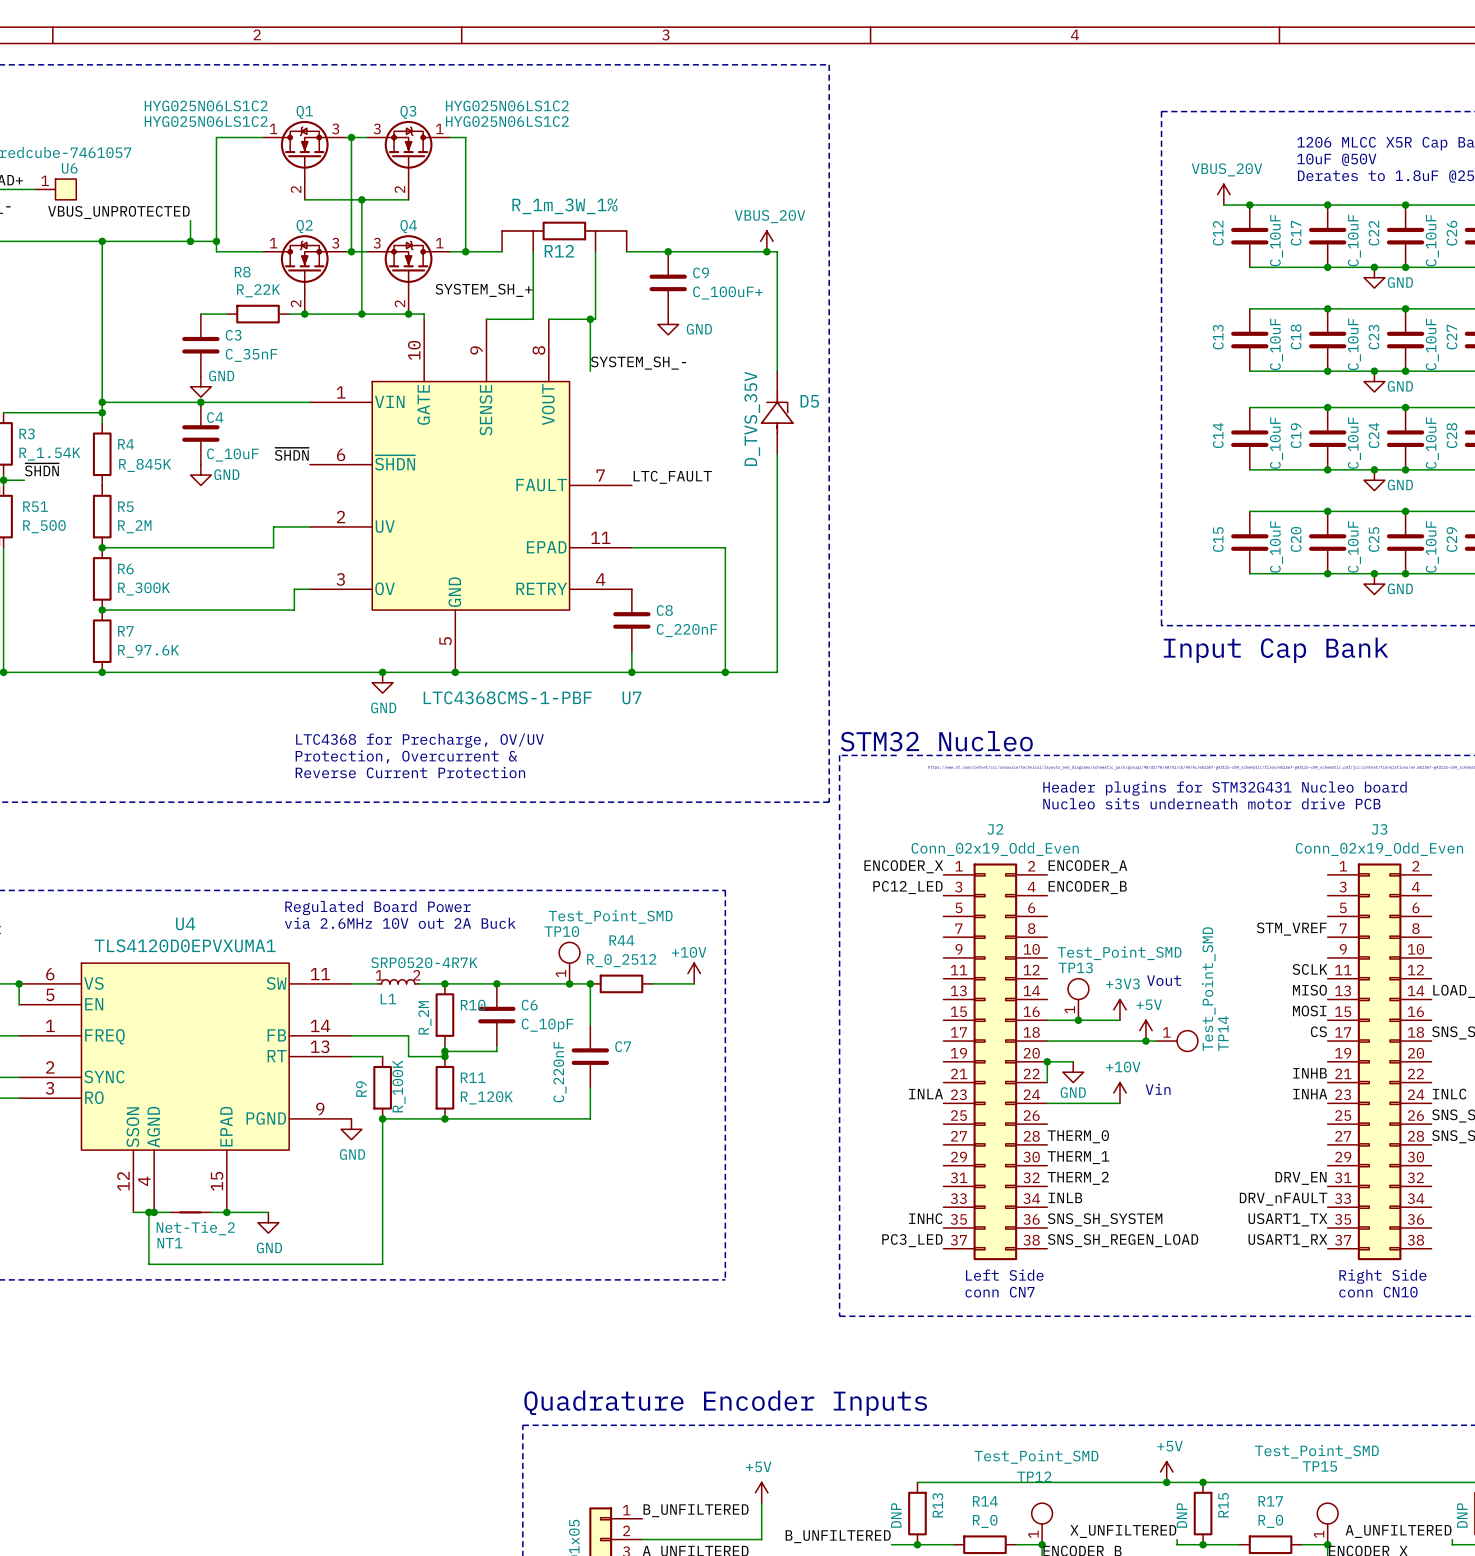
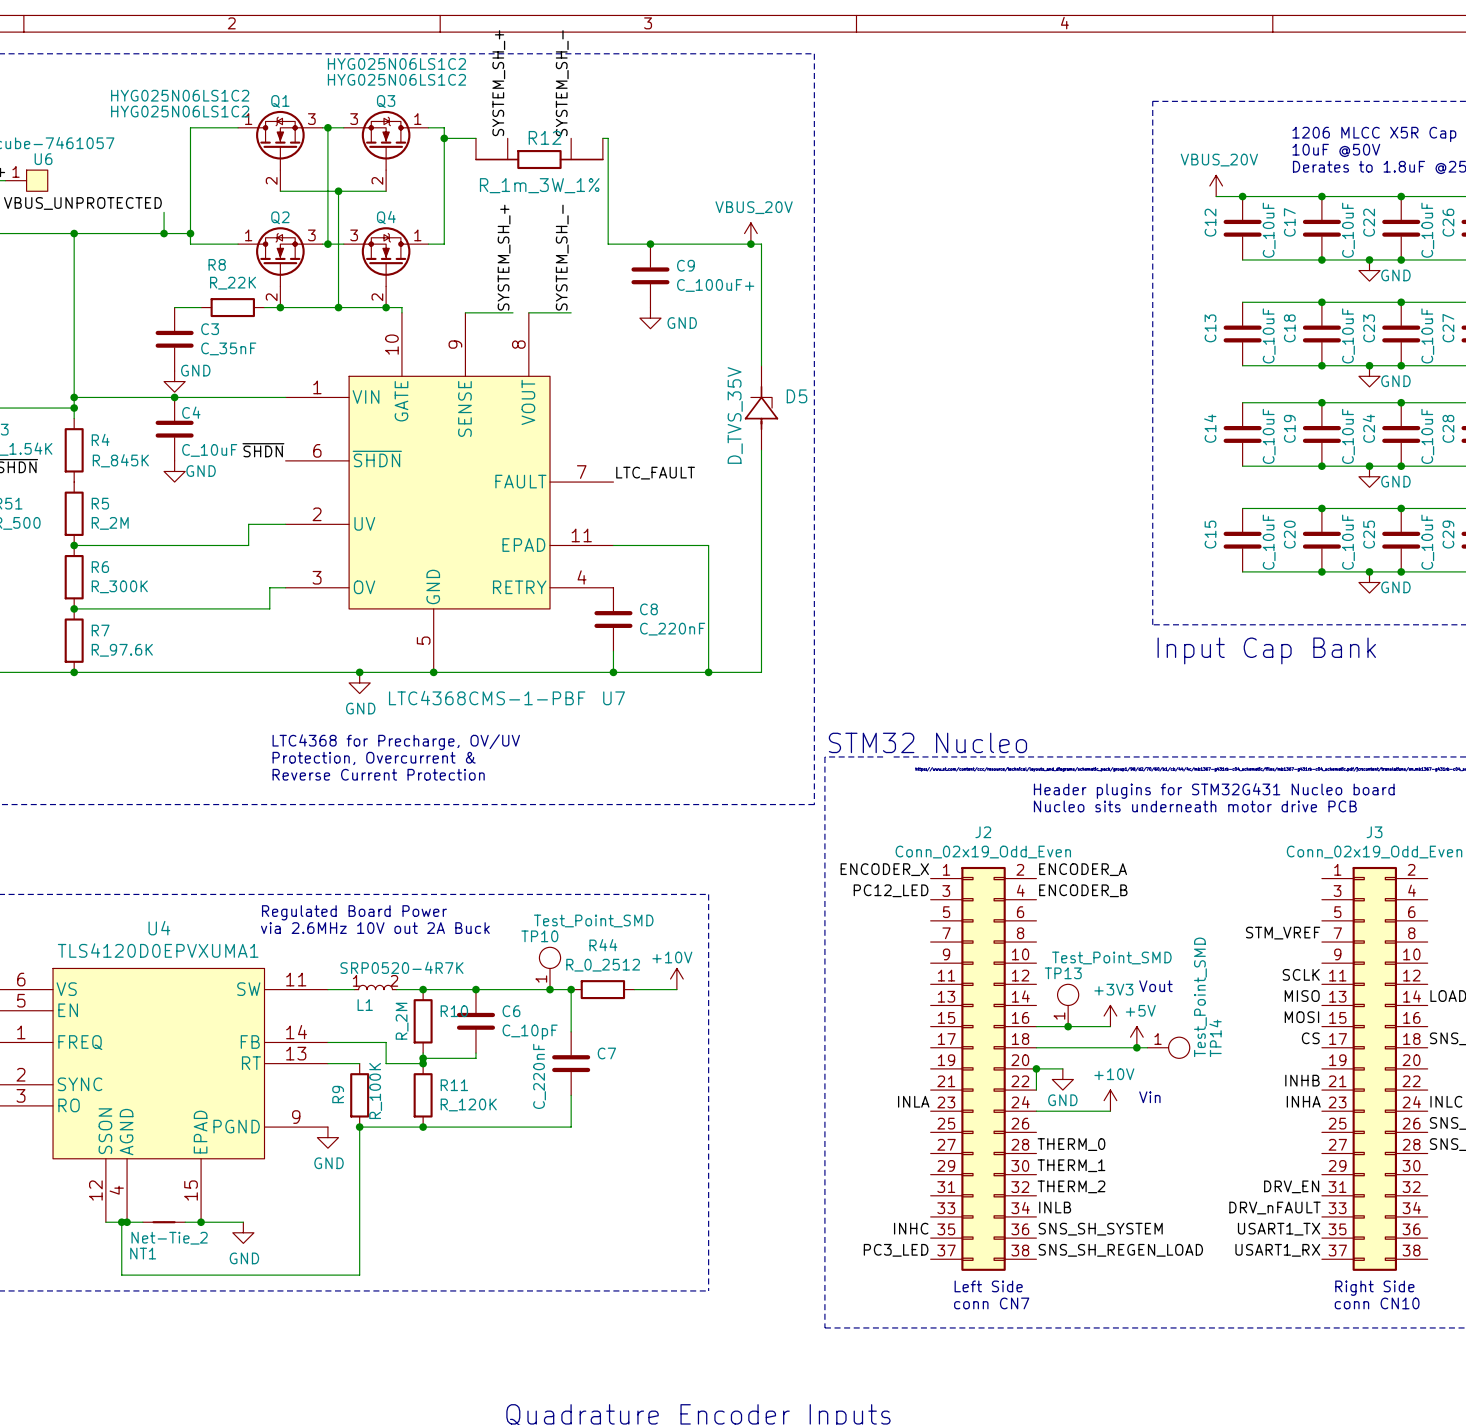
label: none -> SYSTEM_SH_+ (498, 83)
label: none -> SYSTEM_SH_- (562, 83)
Q3 value position: HYG025N06LS1C2 (507, 105) -> HYG025N06LS1C2 (396, 63)
Q4 value position: HYG025N06LS1C2 (507, 121) -> HYG025N06LS1C2 (396, 79)
wire: none -> (444, 138) (475, 138)
junction: none -> (444, 138)
wire: none -> (602, 138) (608, 138) (608, 244)
R12 rotation: 0° (564, 230) -> 180° (539, 159)
wire: (465, 251) (502, 251) -> none
junction: (465, 251) -> none
wire: (533, 251) (533, 319) -> none
wire: (595, 251) (595, 319) (590, 319) (590, 371) -> none
label rotation: 0° (483, 290) -> 90° counterclockwise (504, 257)
junction: (590, 319) -> none
label rotation: 0° (638, 363) -> 90° counterclockwise (562, 257)
label position: SYSTEM_SH_- (638, 363) -> SYSTEM_SH_- (562, 257)

